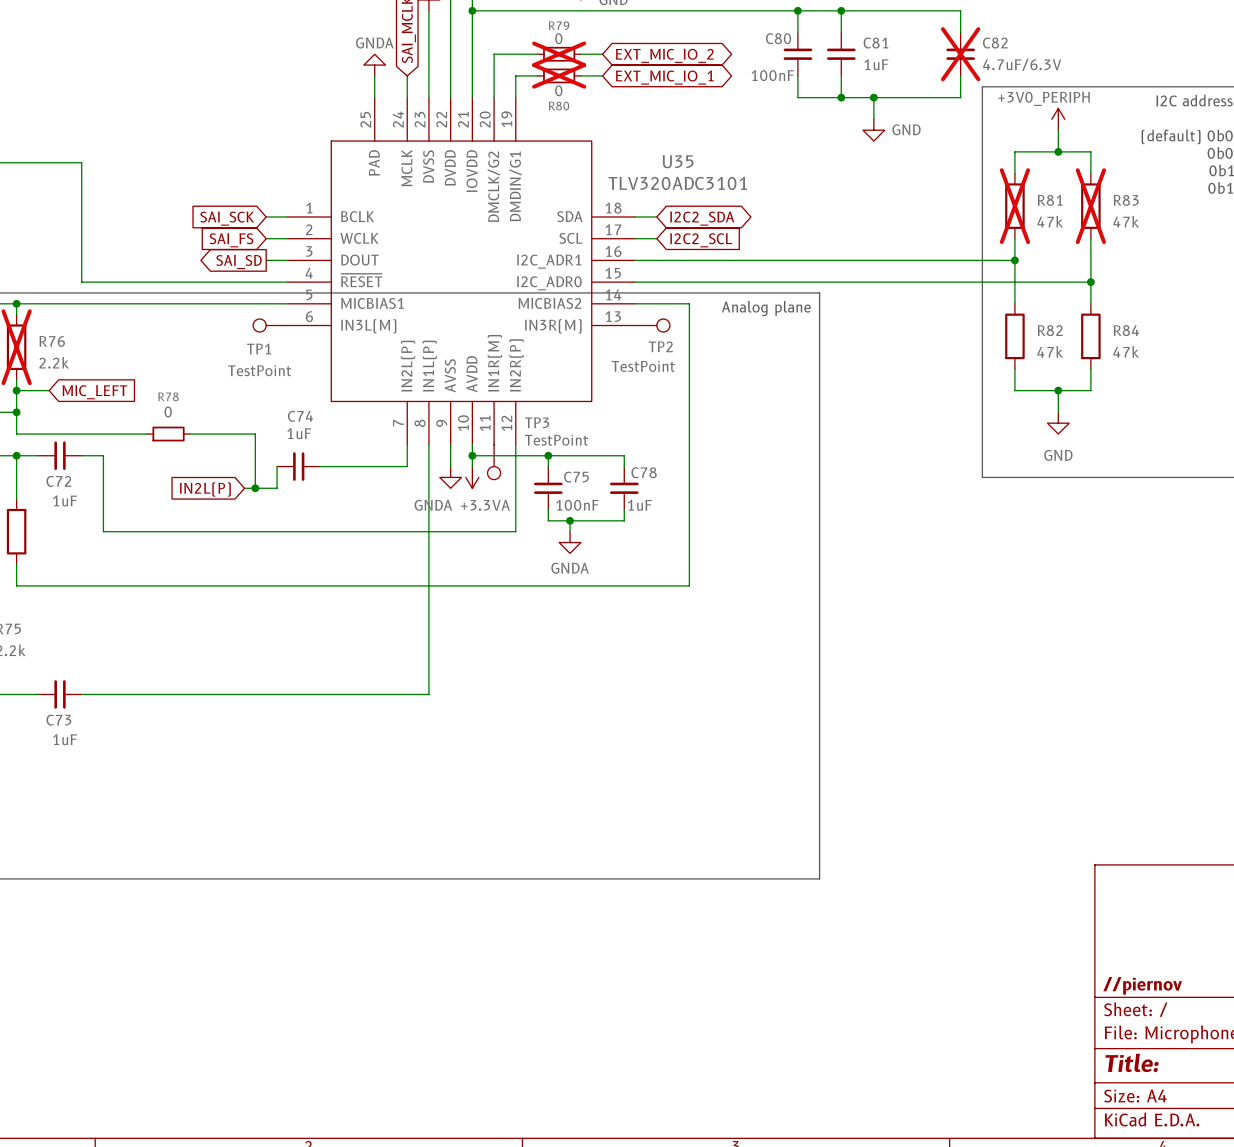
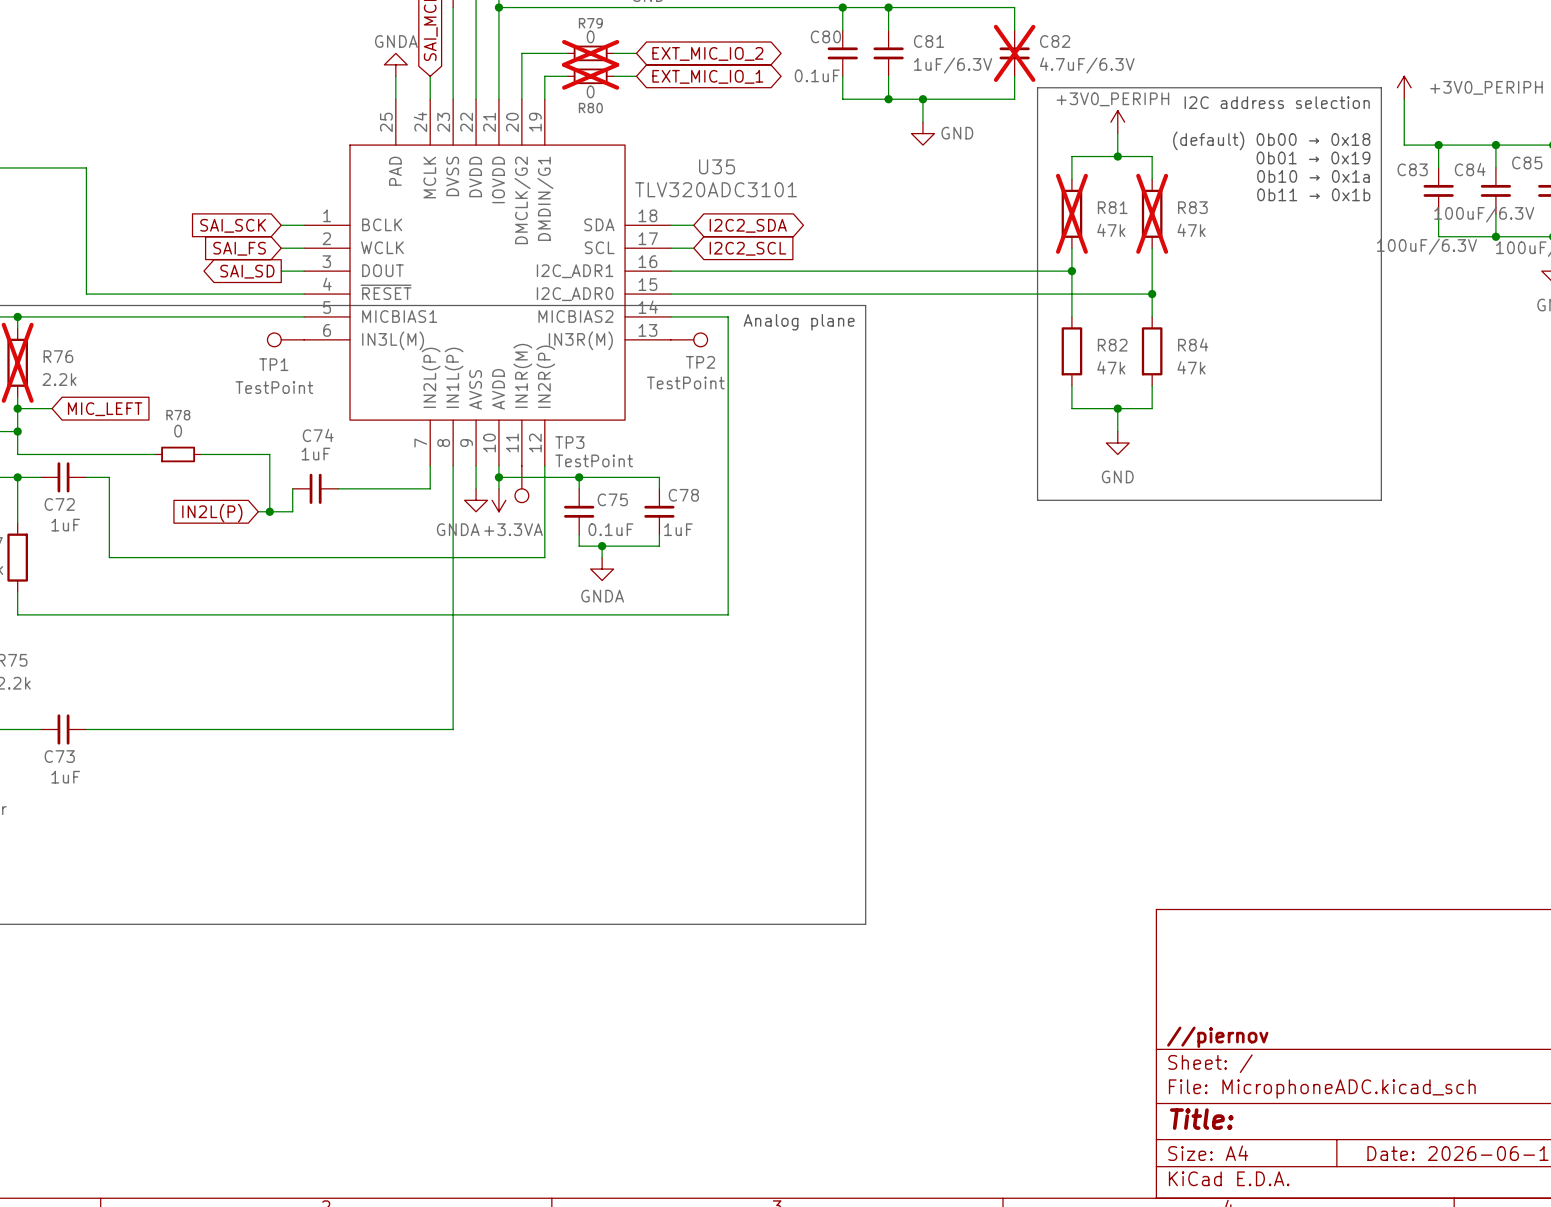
C81 value: 1uF (876, 64) -> 1uF/6.3V (953, 65)
C80 value: 100nF (772, 75) -> 0.1uF (817, 75)
C75 value: 100nF (577, 505) -> 0.1uF (610, 529)

